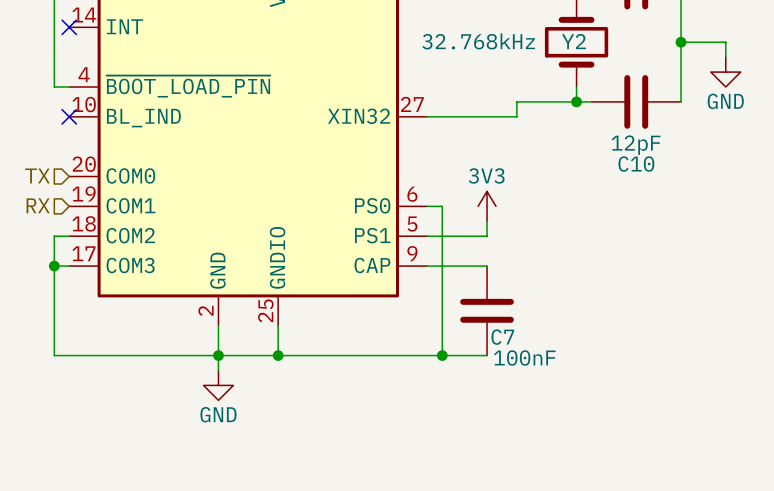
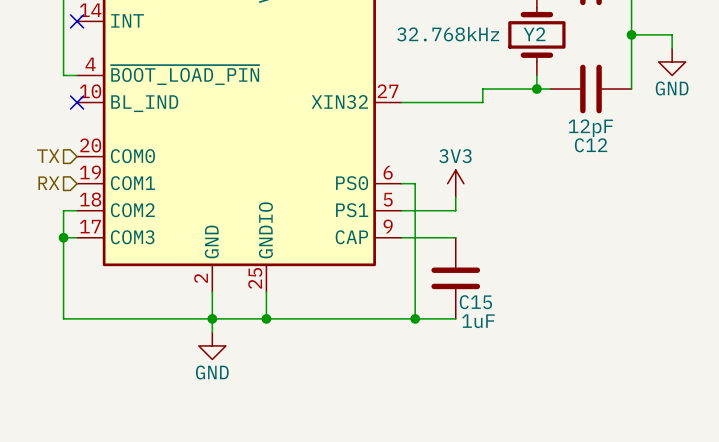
C10 name: C10 (636, 164) -> C12 (591, 145)
C7 name: C7 (502, 337) -> C15 (475, 302)
C7 value: 100nF (524, 358) -> 1uF (478, 321)

